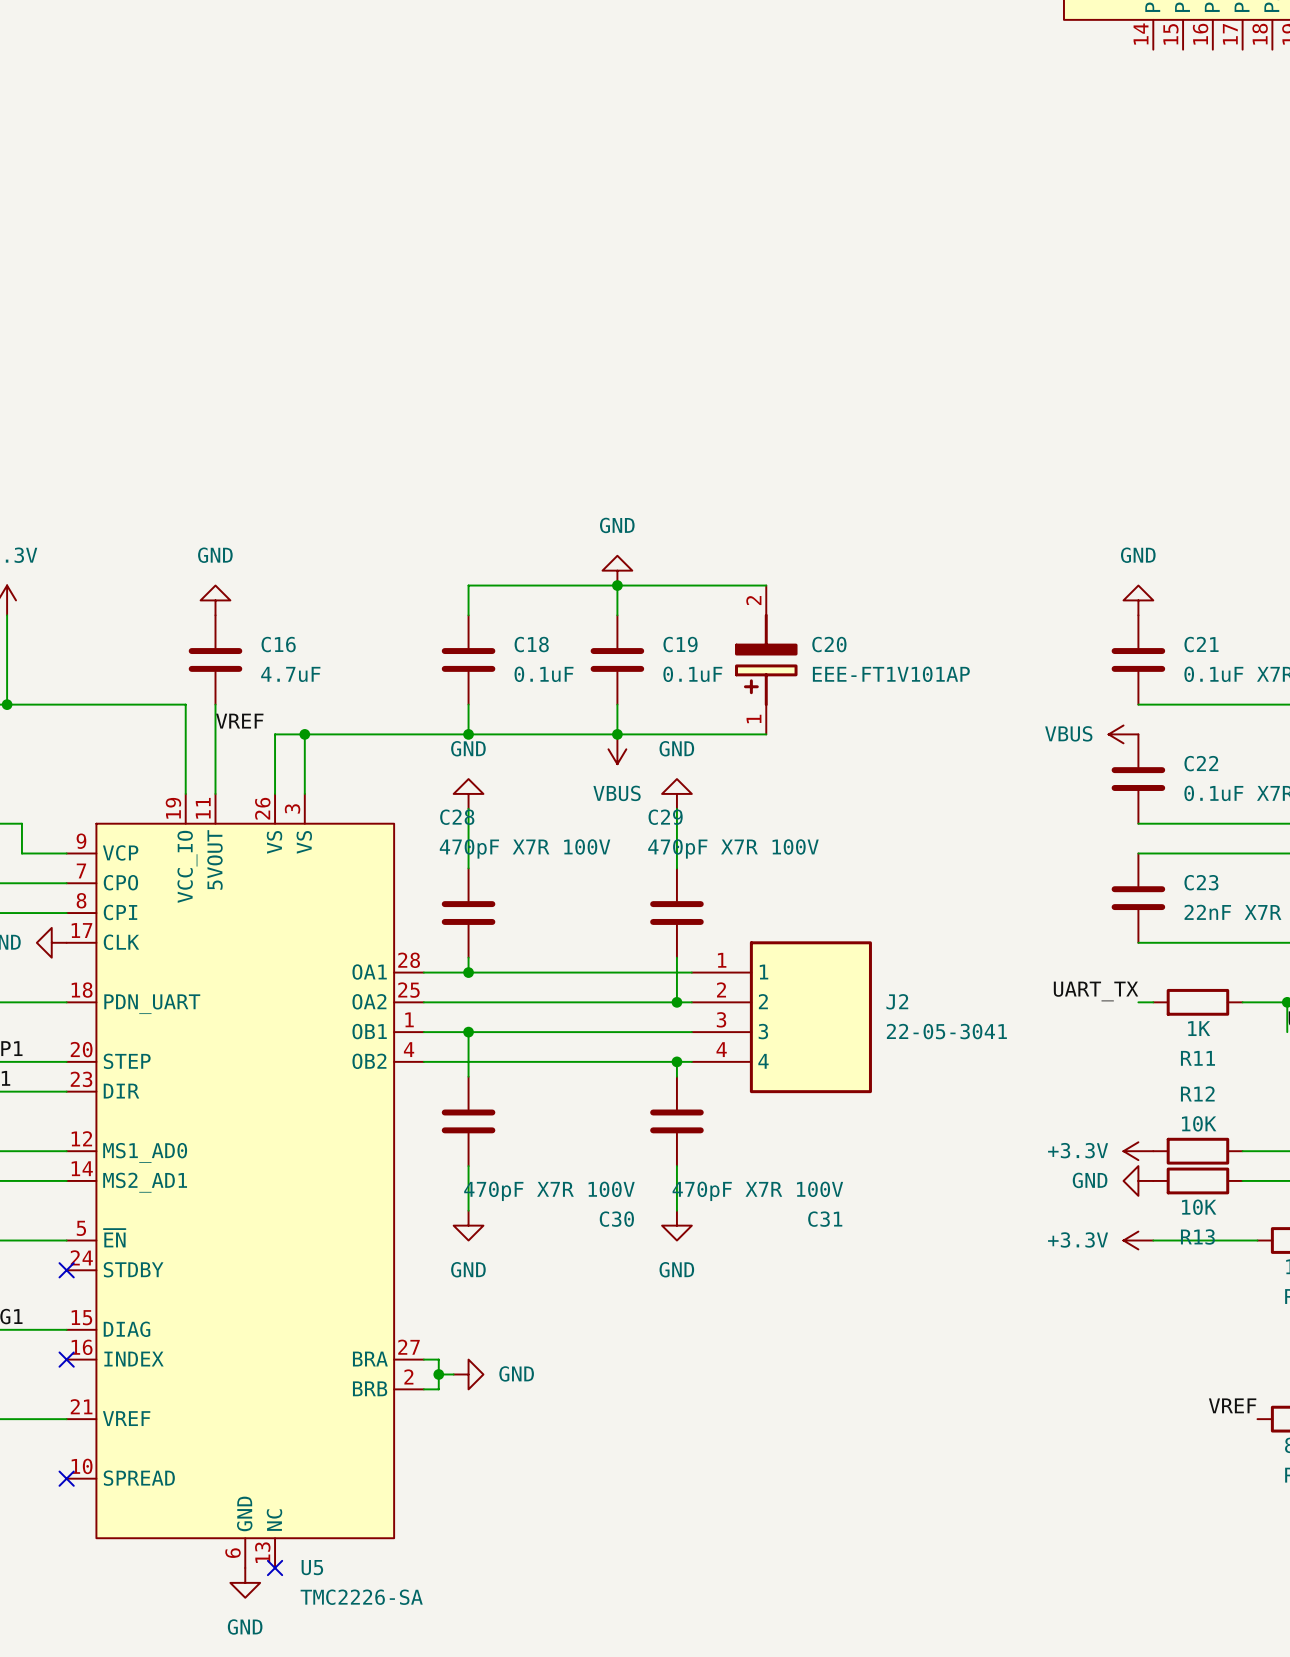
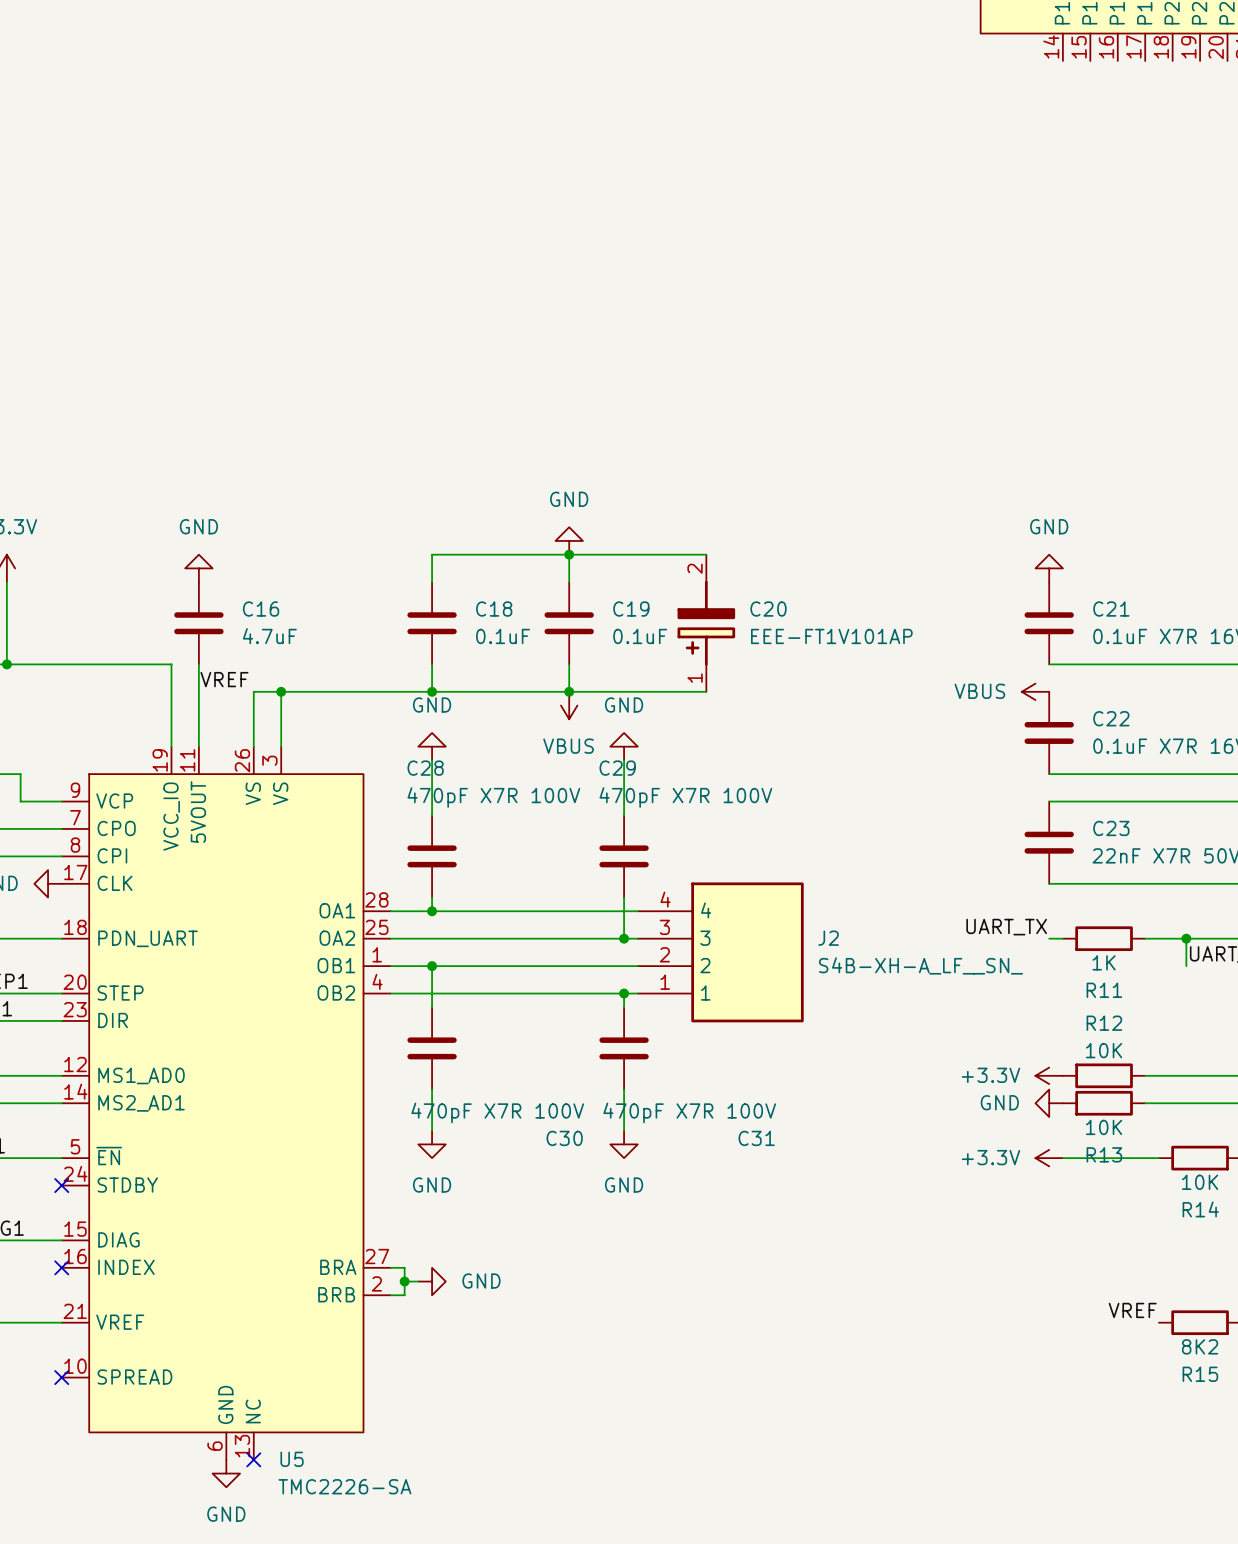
J2 flip: as is (810, 1017) -> up-down (747, 952)
J2 value: 22-05-3041 (946, 1031) -> S4B-XH-A_LF__SN_ (920, 965)

